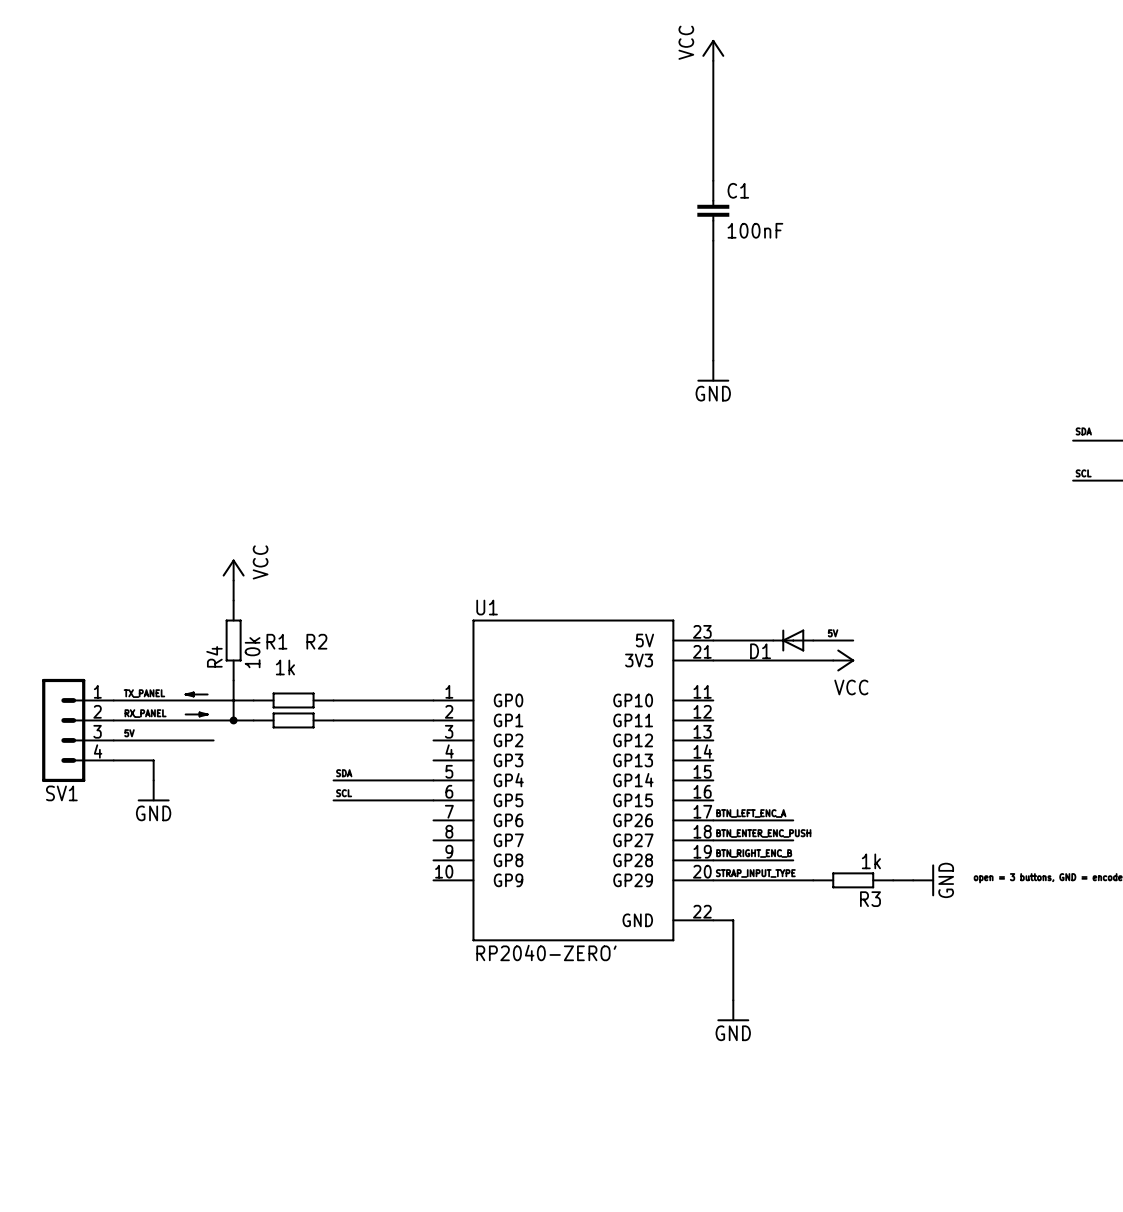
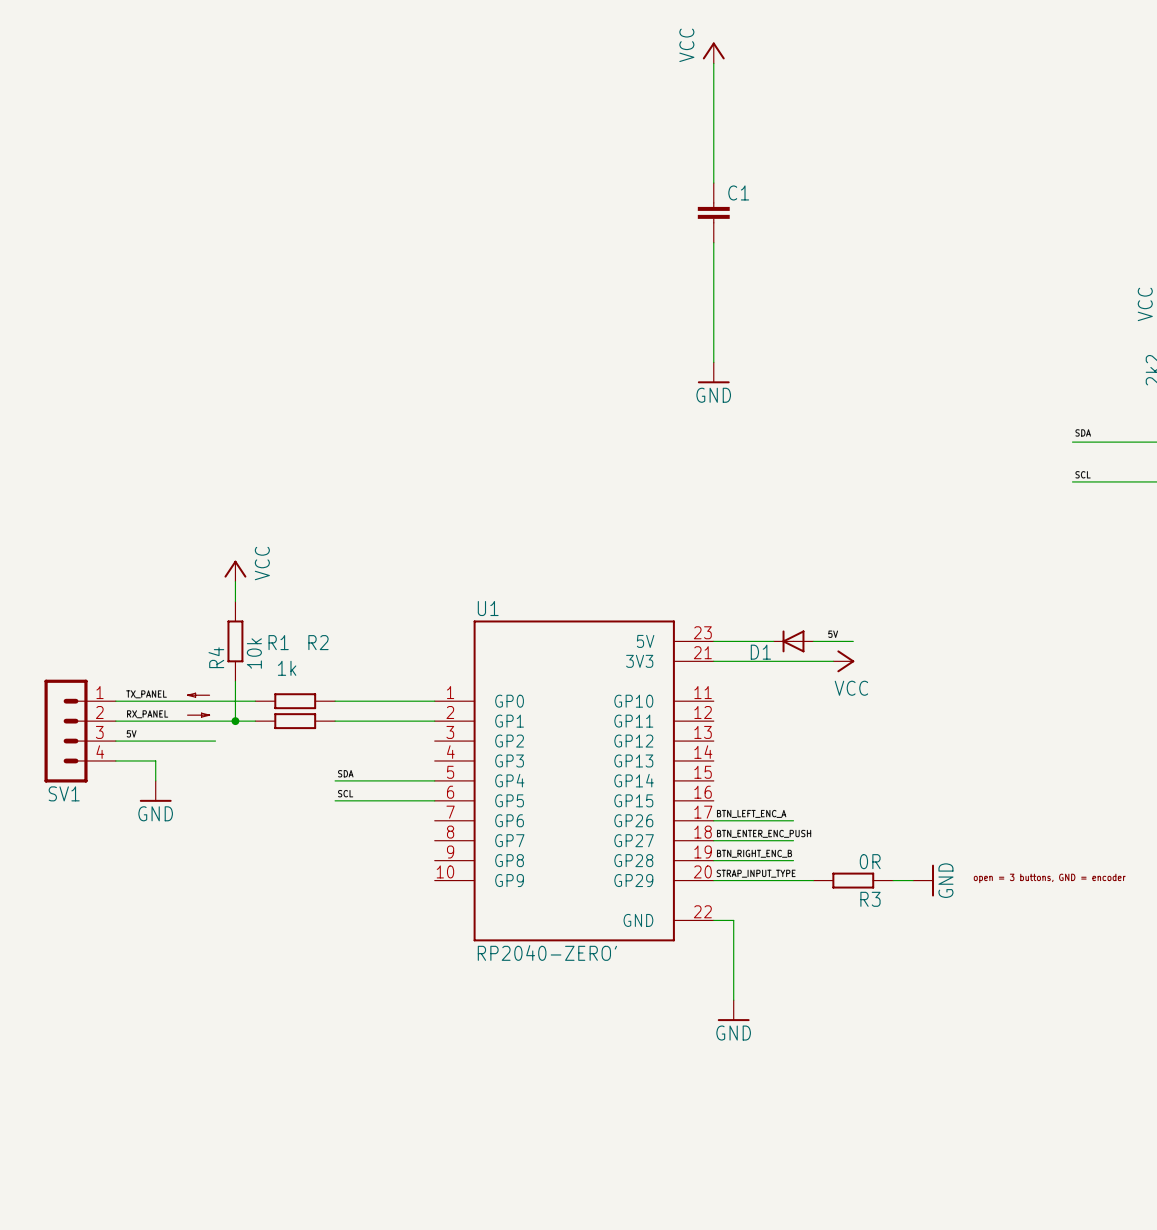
C1 value: 100nF (755, 230) -> none
R3 value: 1k (871, 861) -> 0R (870, 861)

